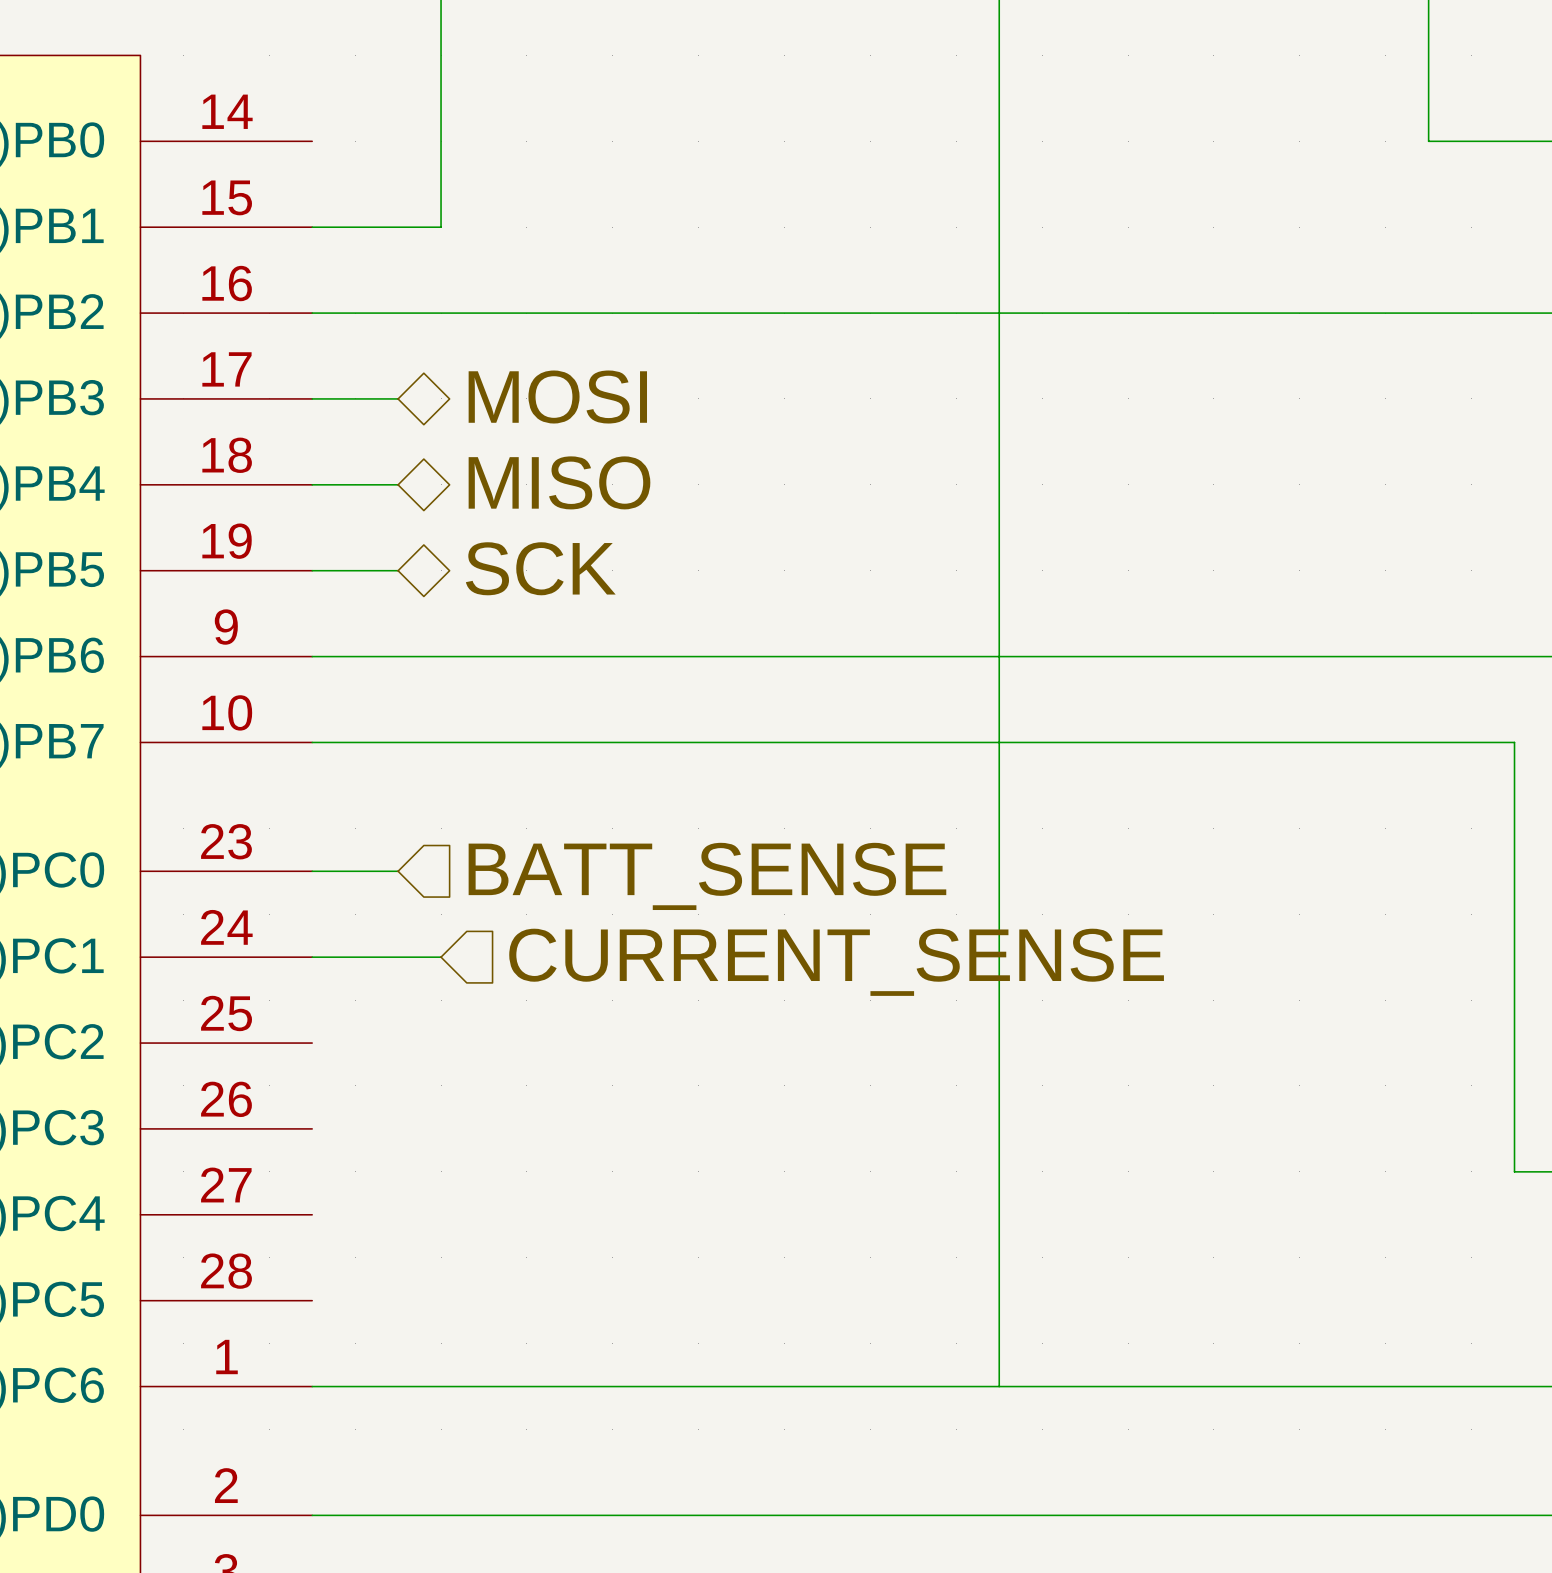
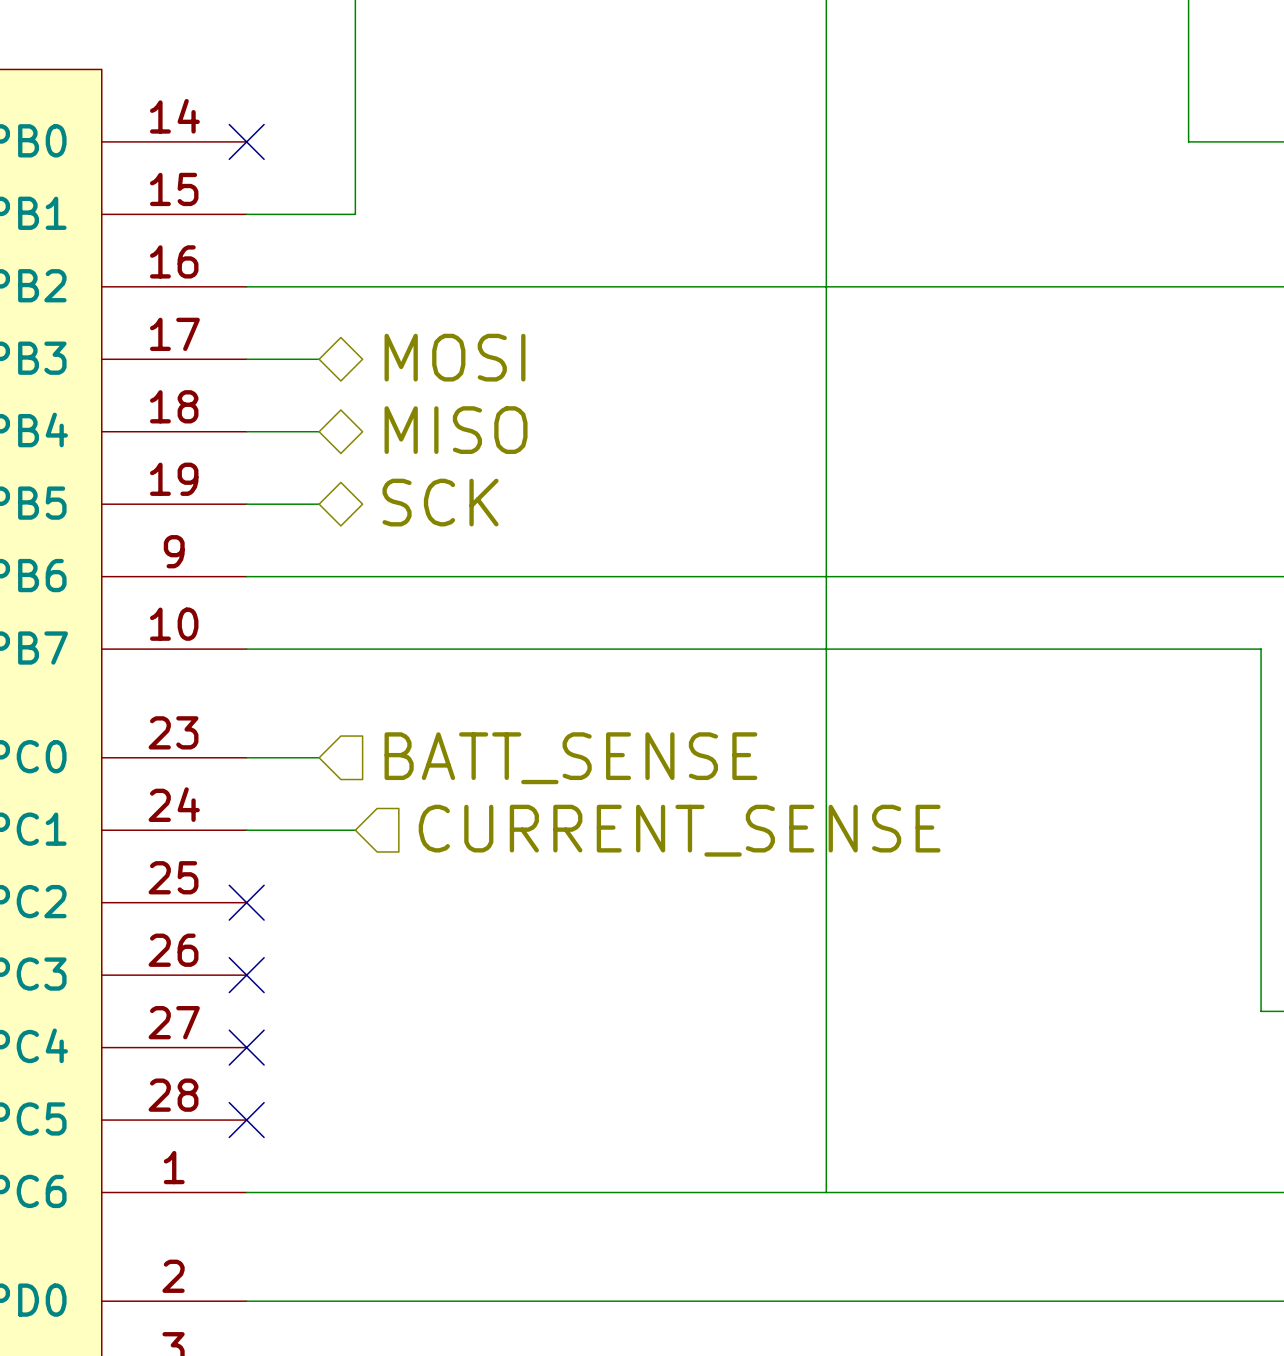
no-connect mark: none -> (246, 141)
no-connect mark: none -> (246, 902)
no-connect mark: none -> (246, 975)
no-connect mark: none -> (246, 1047)
no-connect mark: none -> (246, 1120)

